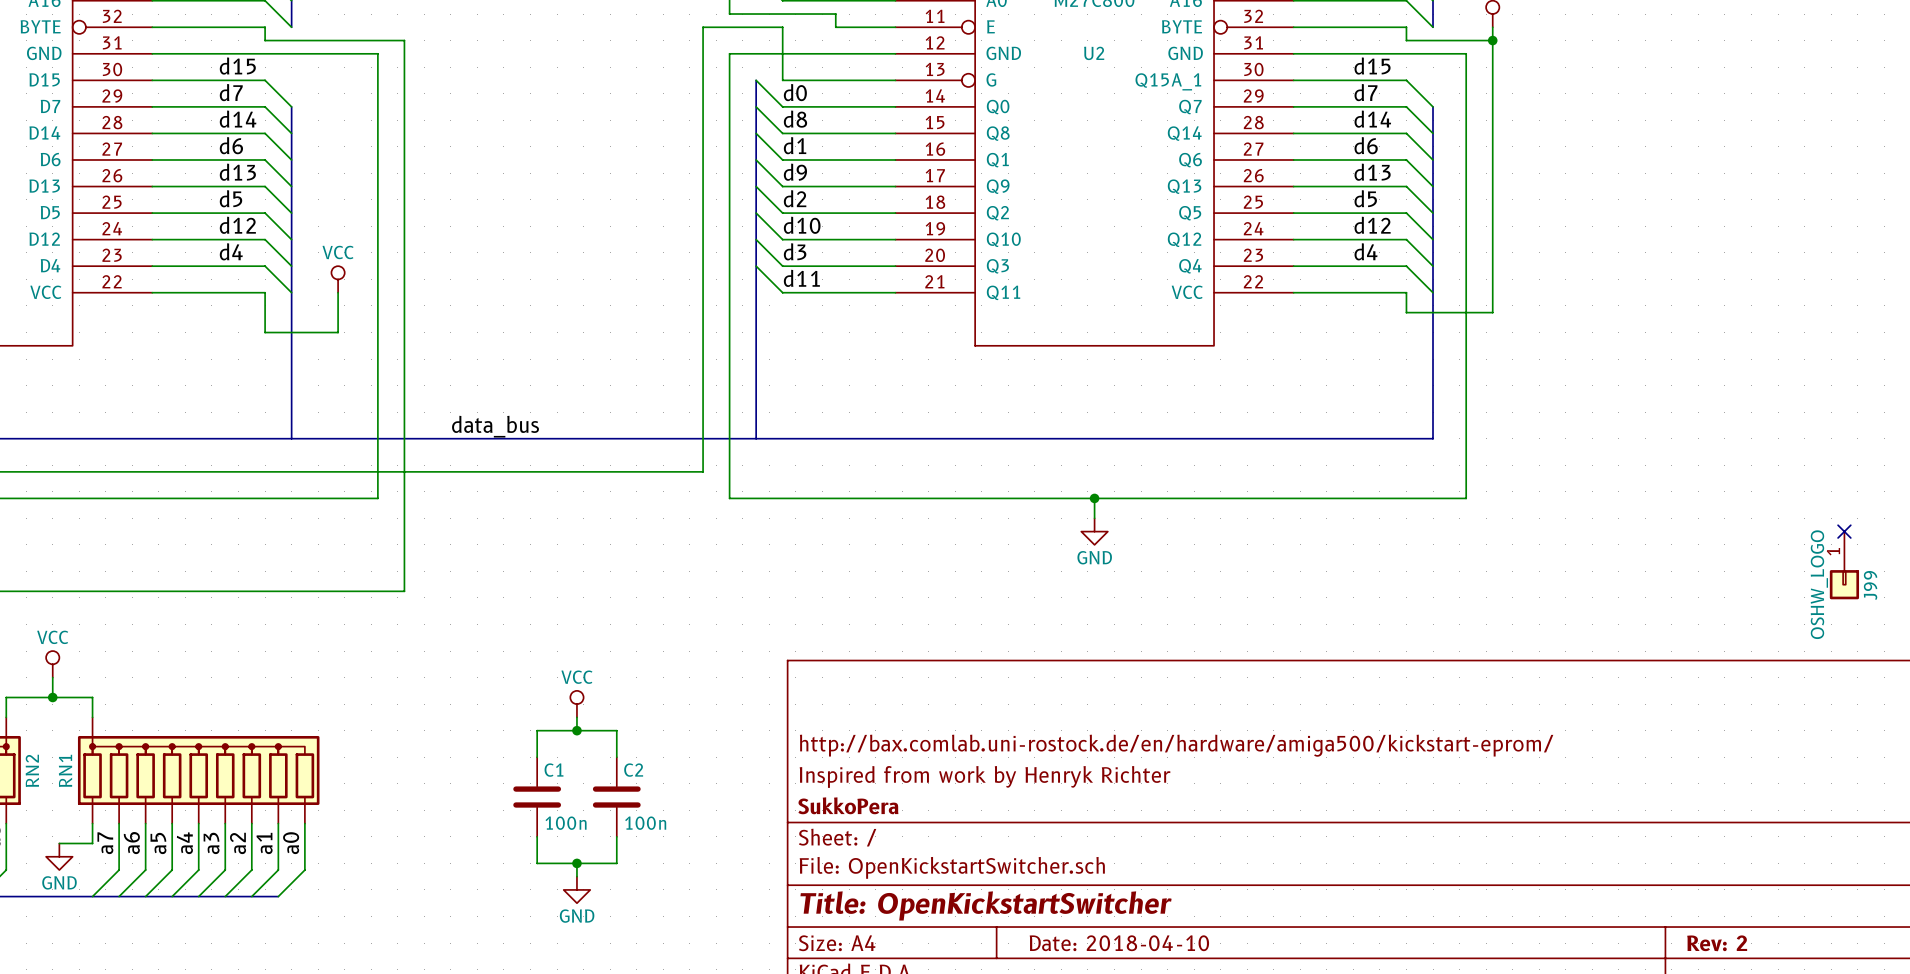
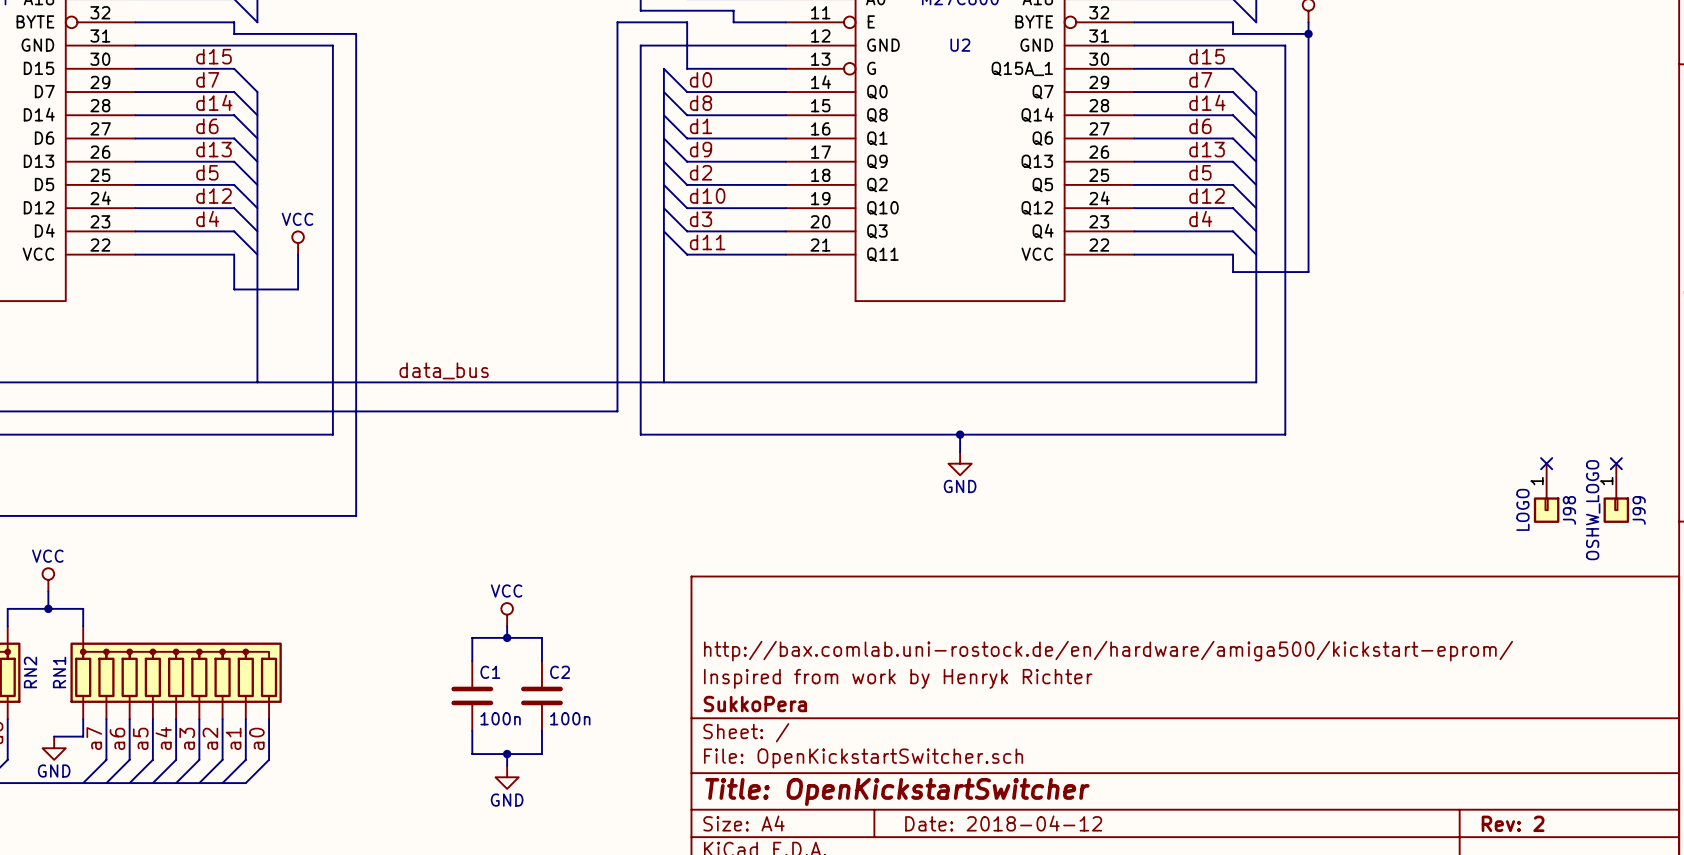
no-connect mark: none -> (1546, 463)
J98: none -> LOGO (1546, 493)
title block: Date: 2018-04-10 (1119, 943) -> Date: 2018-04-12 (1003, 823)

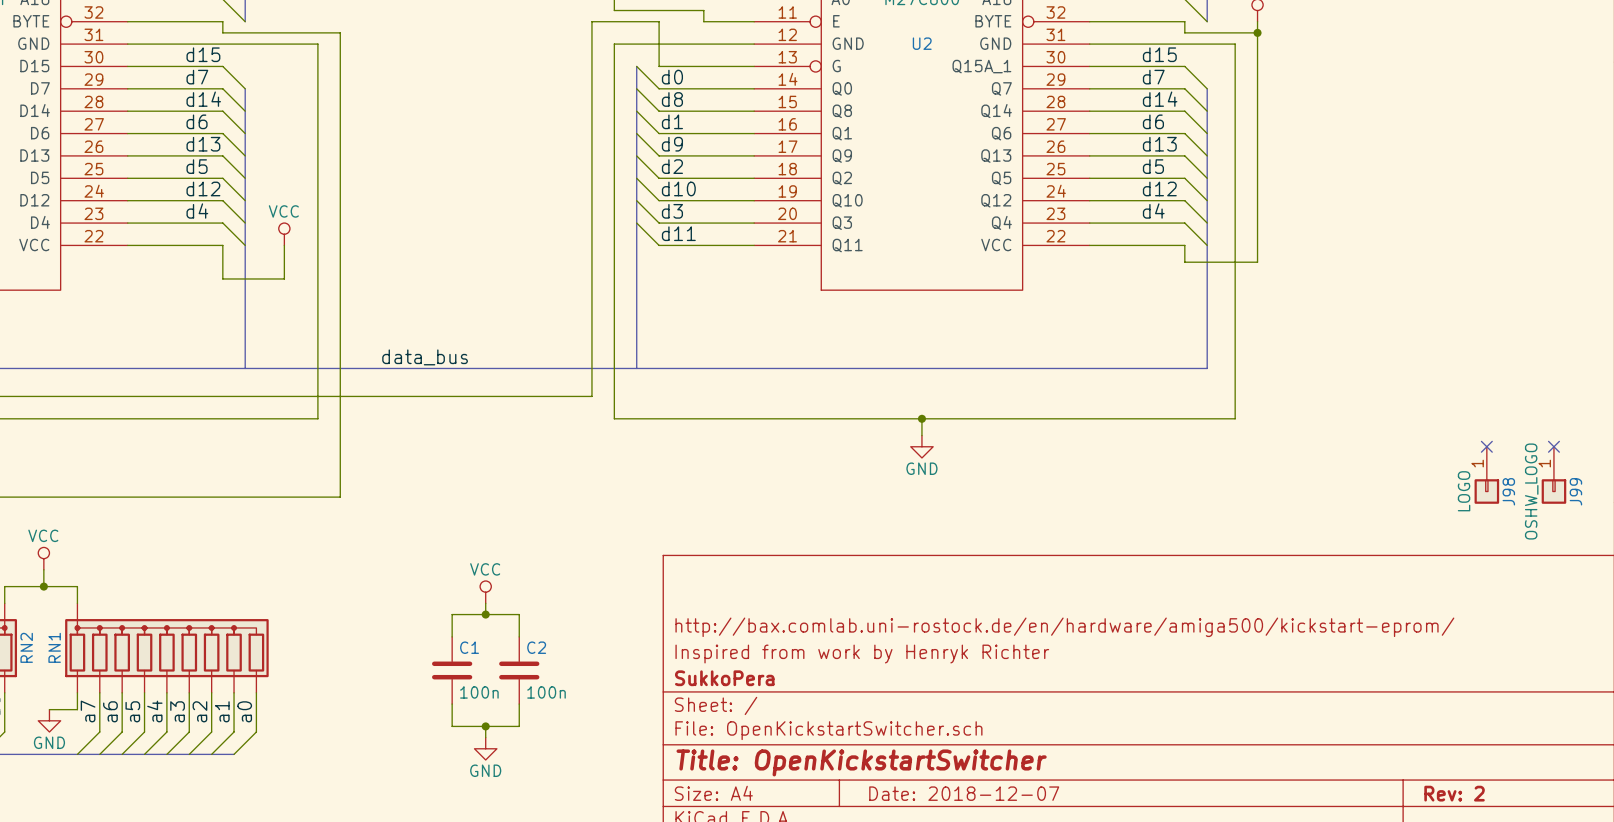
title block: Date: 2018-04-12 (1003, 823) -> Date: 2018-12-07 (964, 793)

